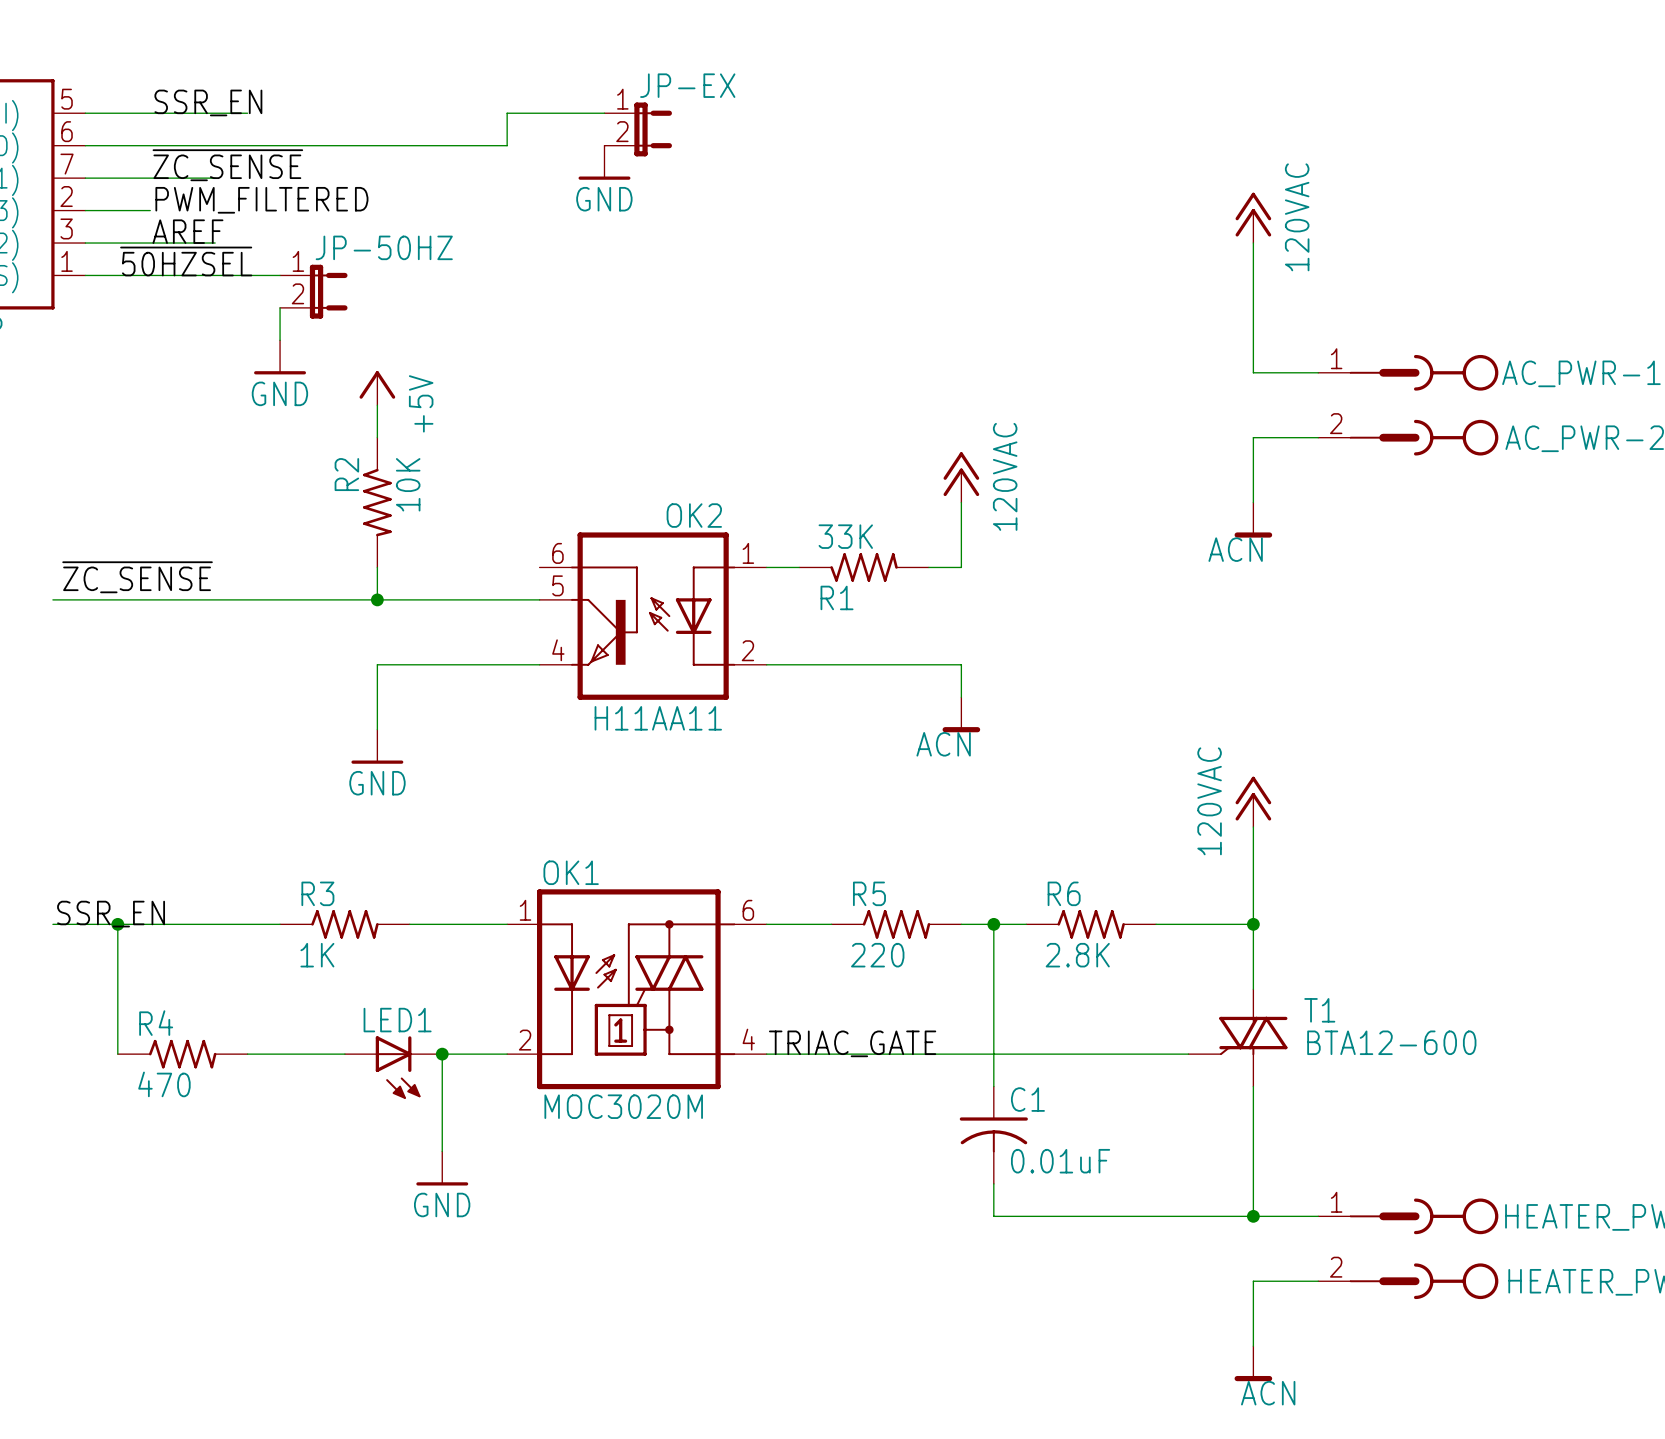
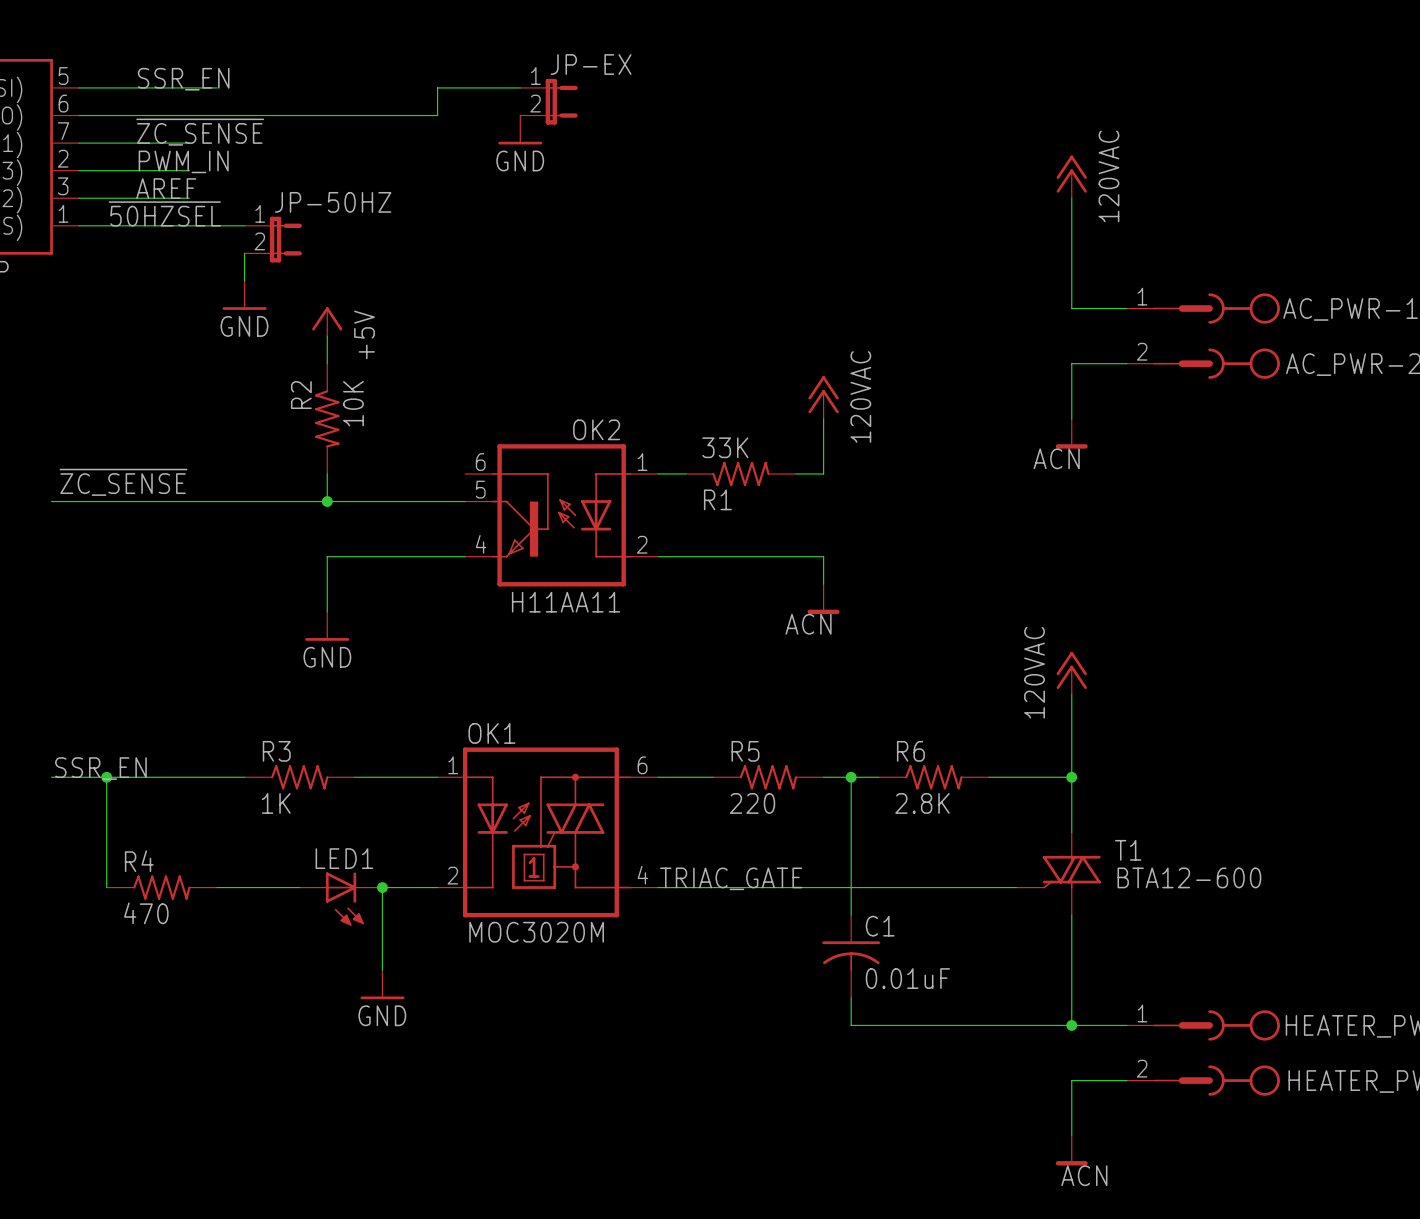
label: PWM_FILTERED (261, 200) -> PWM_IN (183, 161)
wire: none -> (134, 170) (189, 170)

